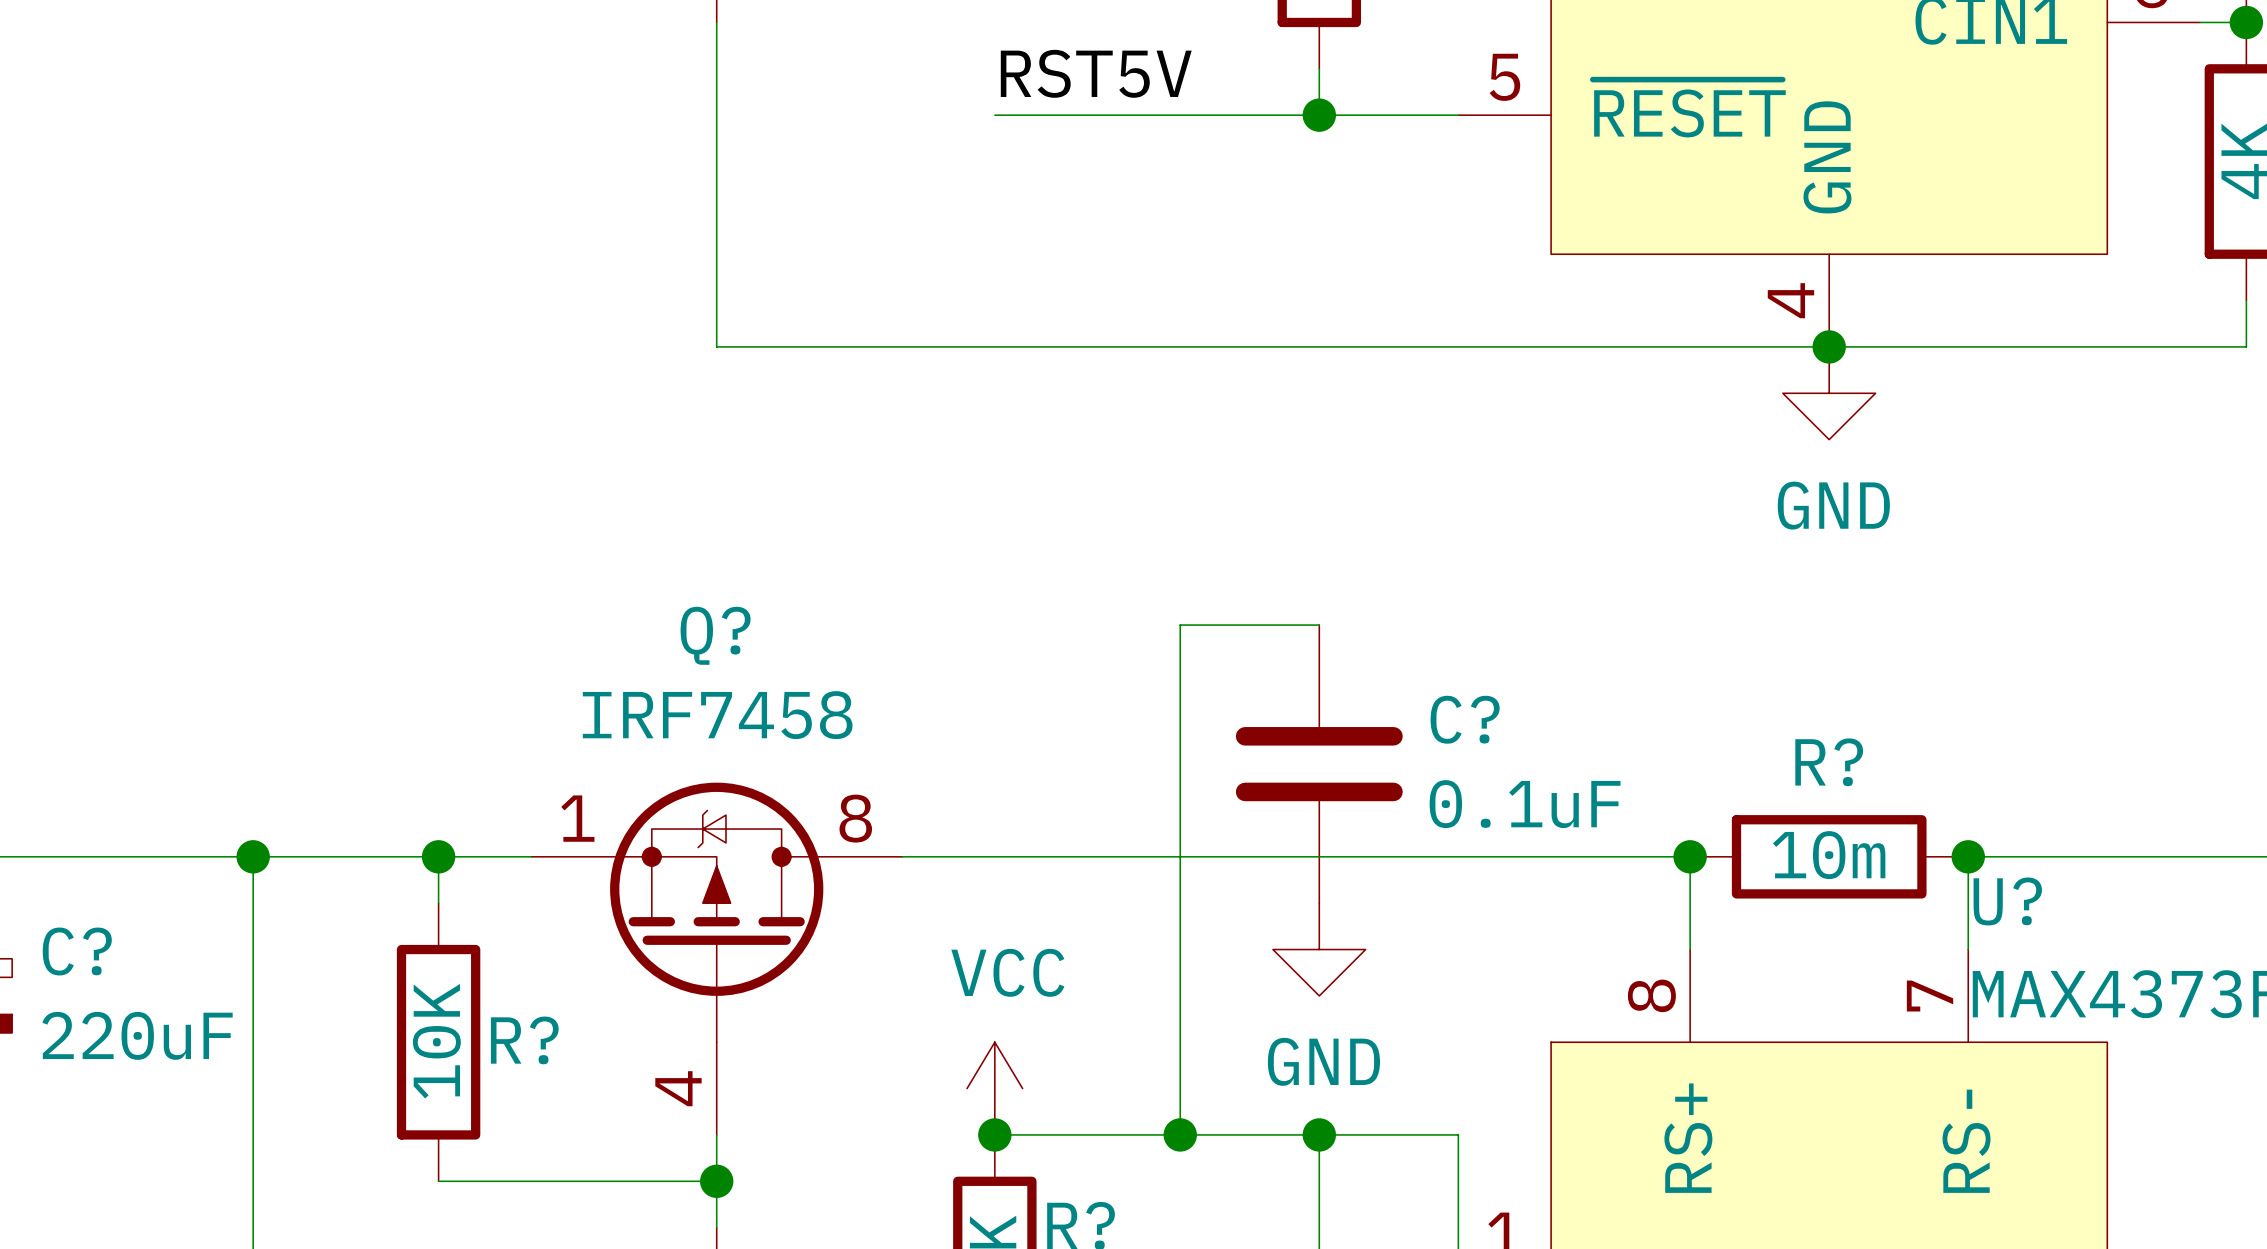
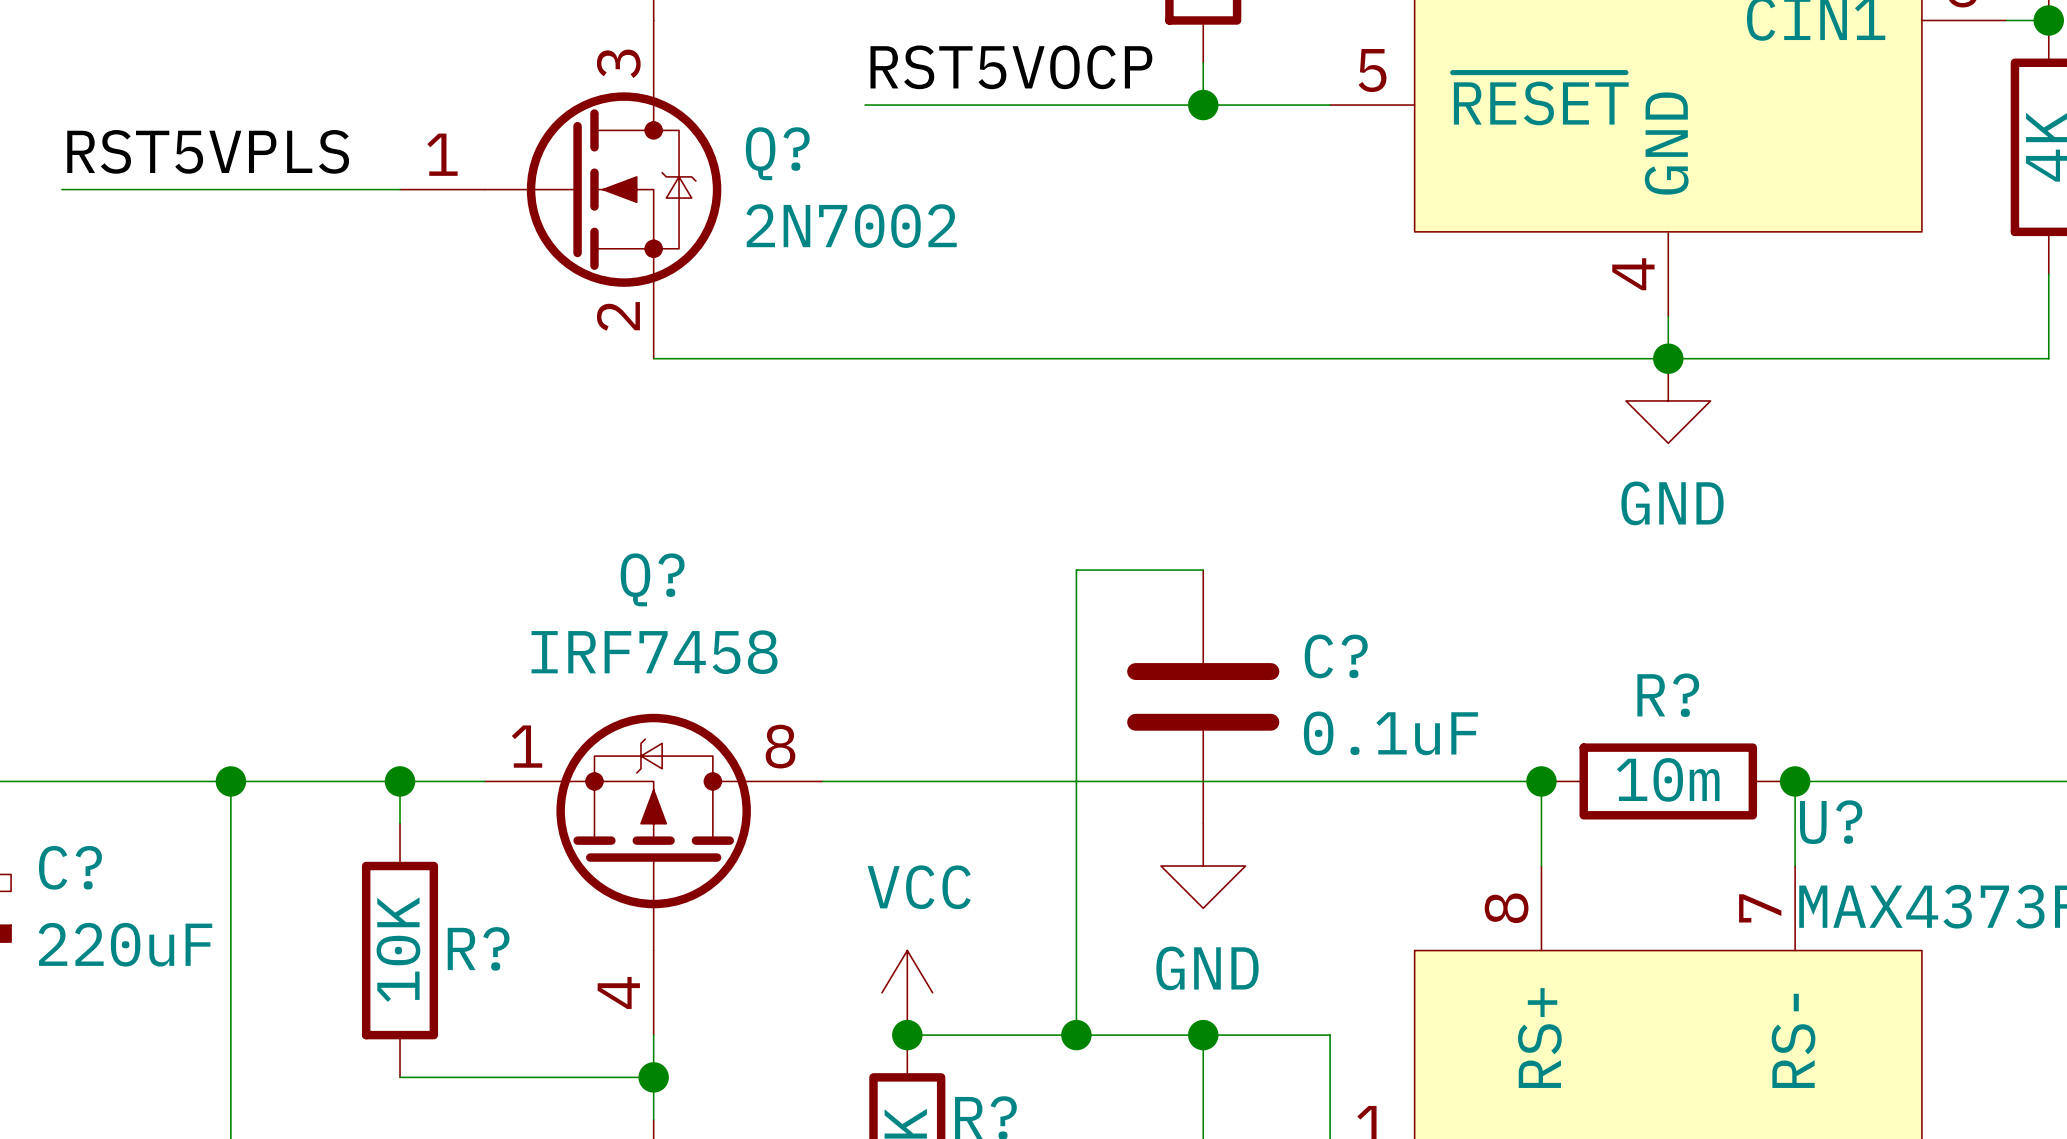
wire: (716, 22) (716, 346) (2246, 346) -> (653, 358) (2048, 358) (2048, 316)
label: RST5V (1096, 73) -> RST5VOCP (1011, 67)
wire: none -> (865, 105) (907, 105)
label: none -> RST5VPLS (208, 151)
wire: none -> (61, 189) (400, 189)
Q?: none -> 2N7002 (560, 189)
junction position: (1829, 346) -> (1668, 358)
power symbol position: GND (1829, 393) -> GND (1668, 400)

